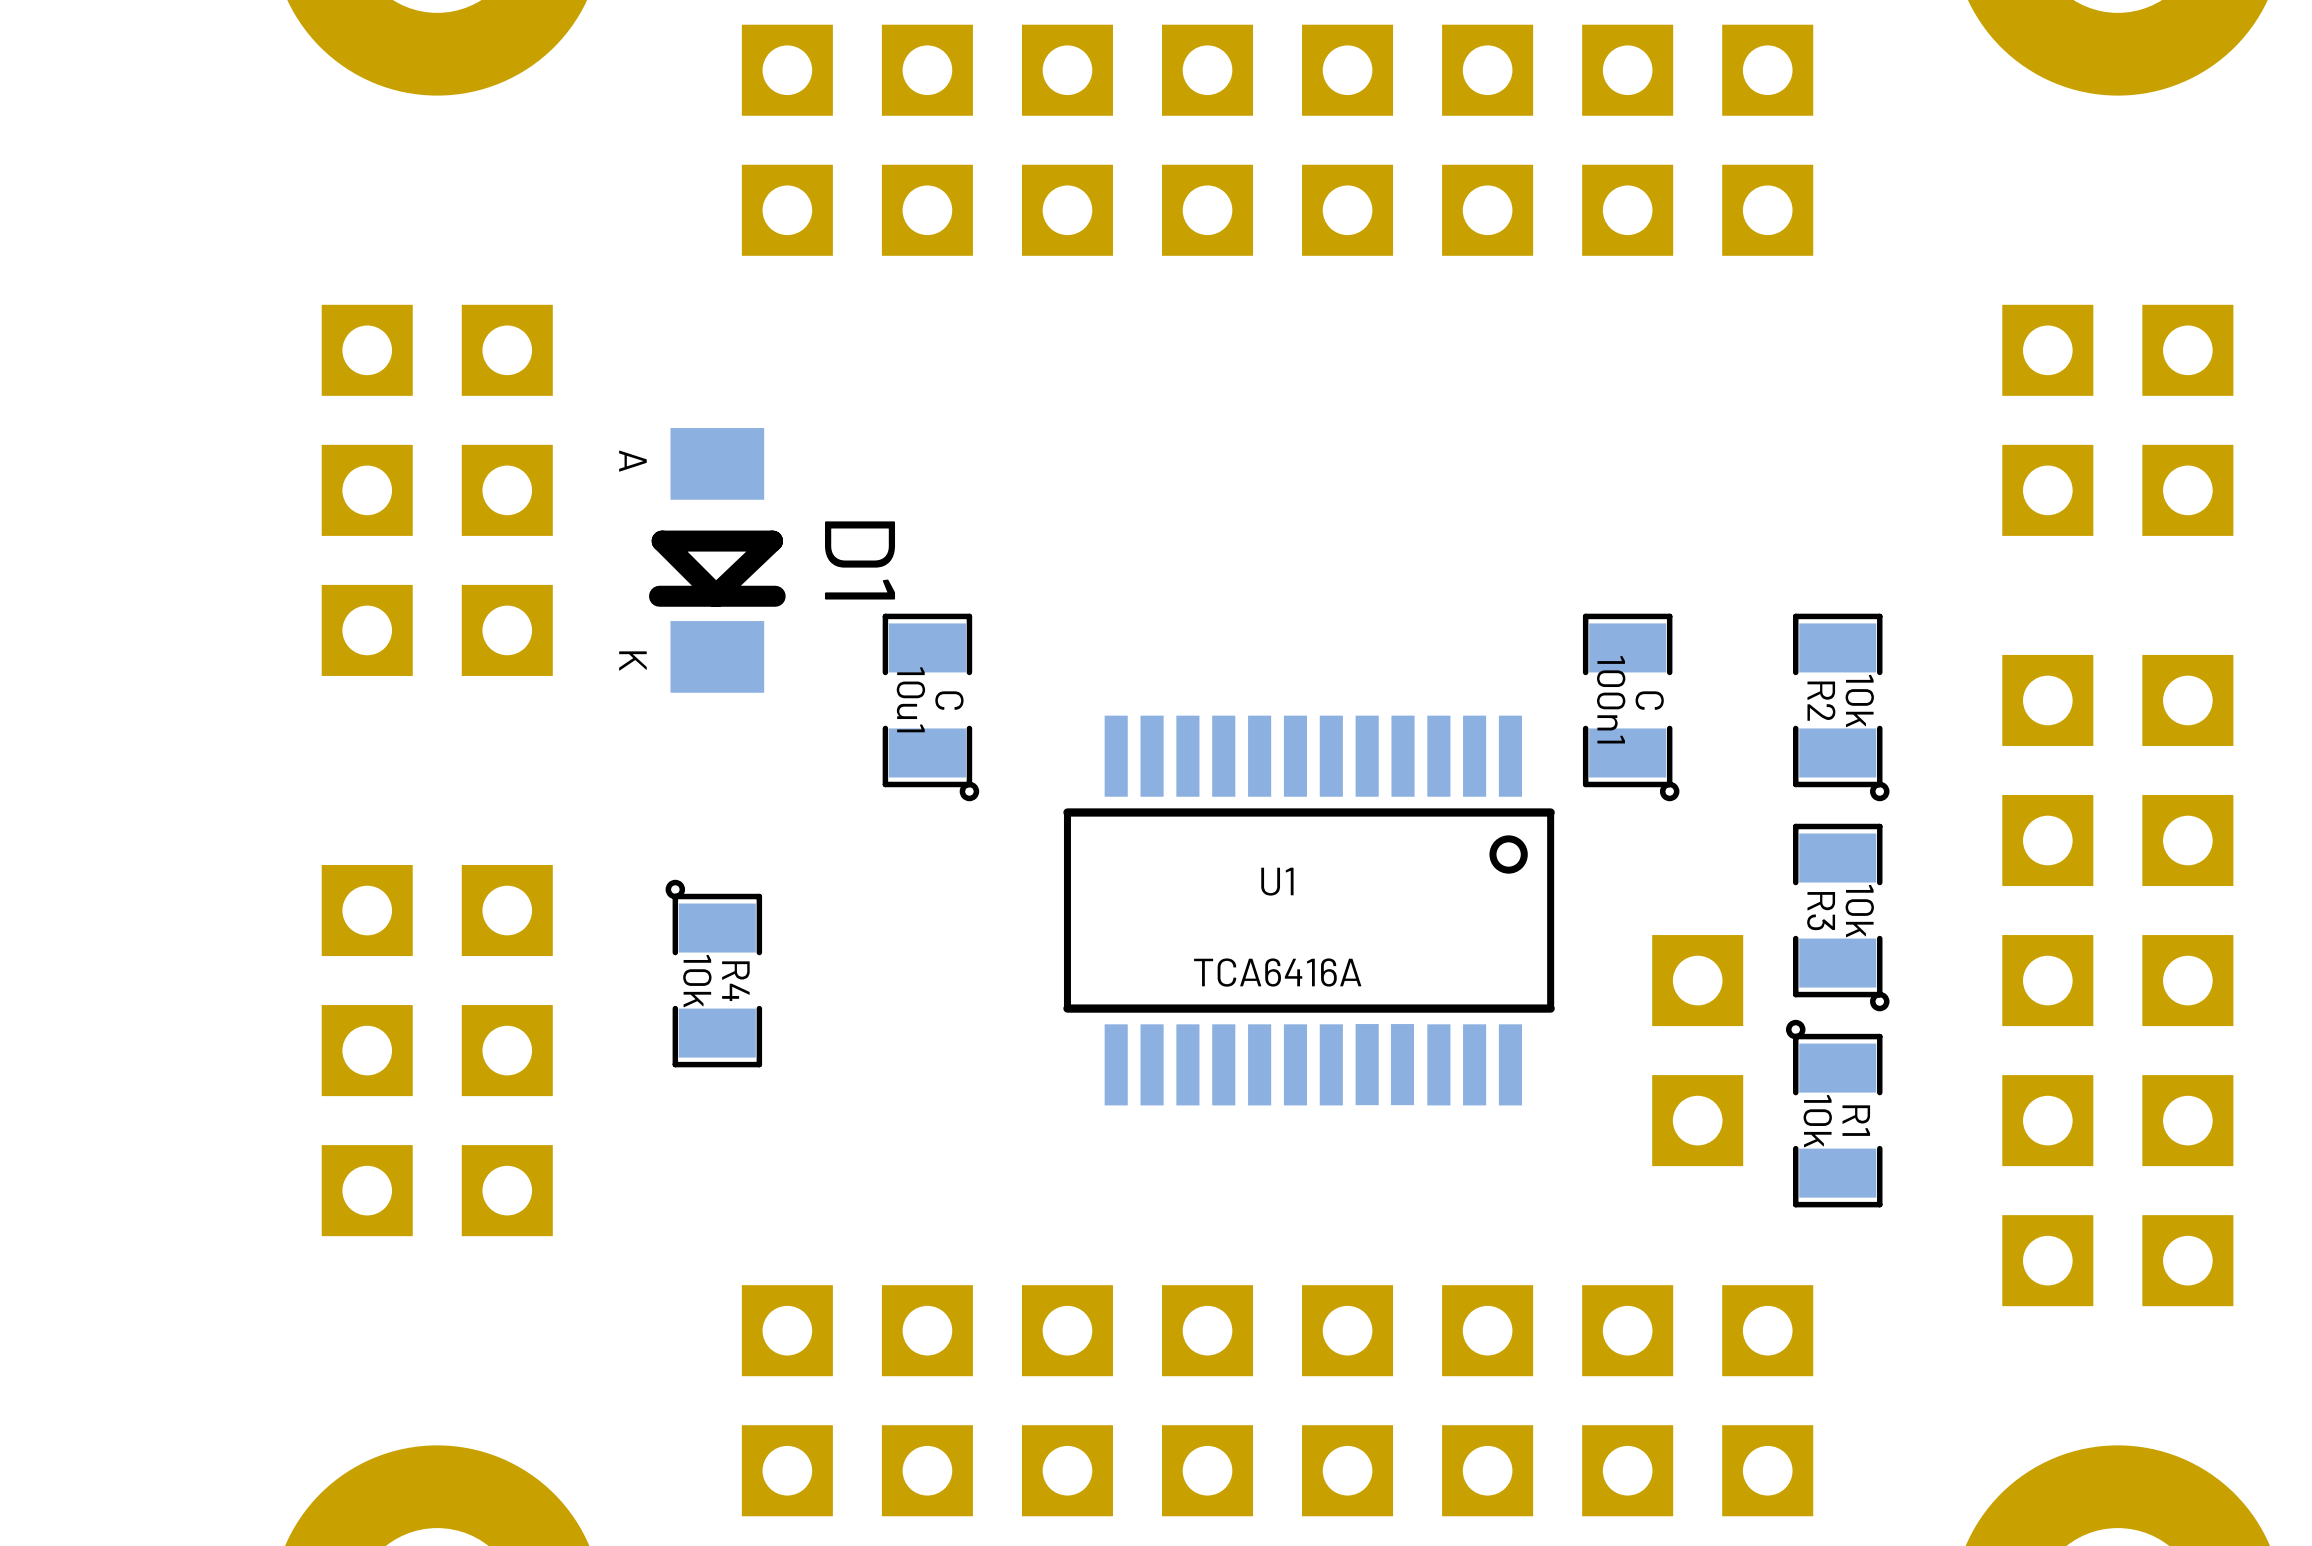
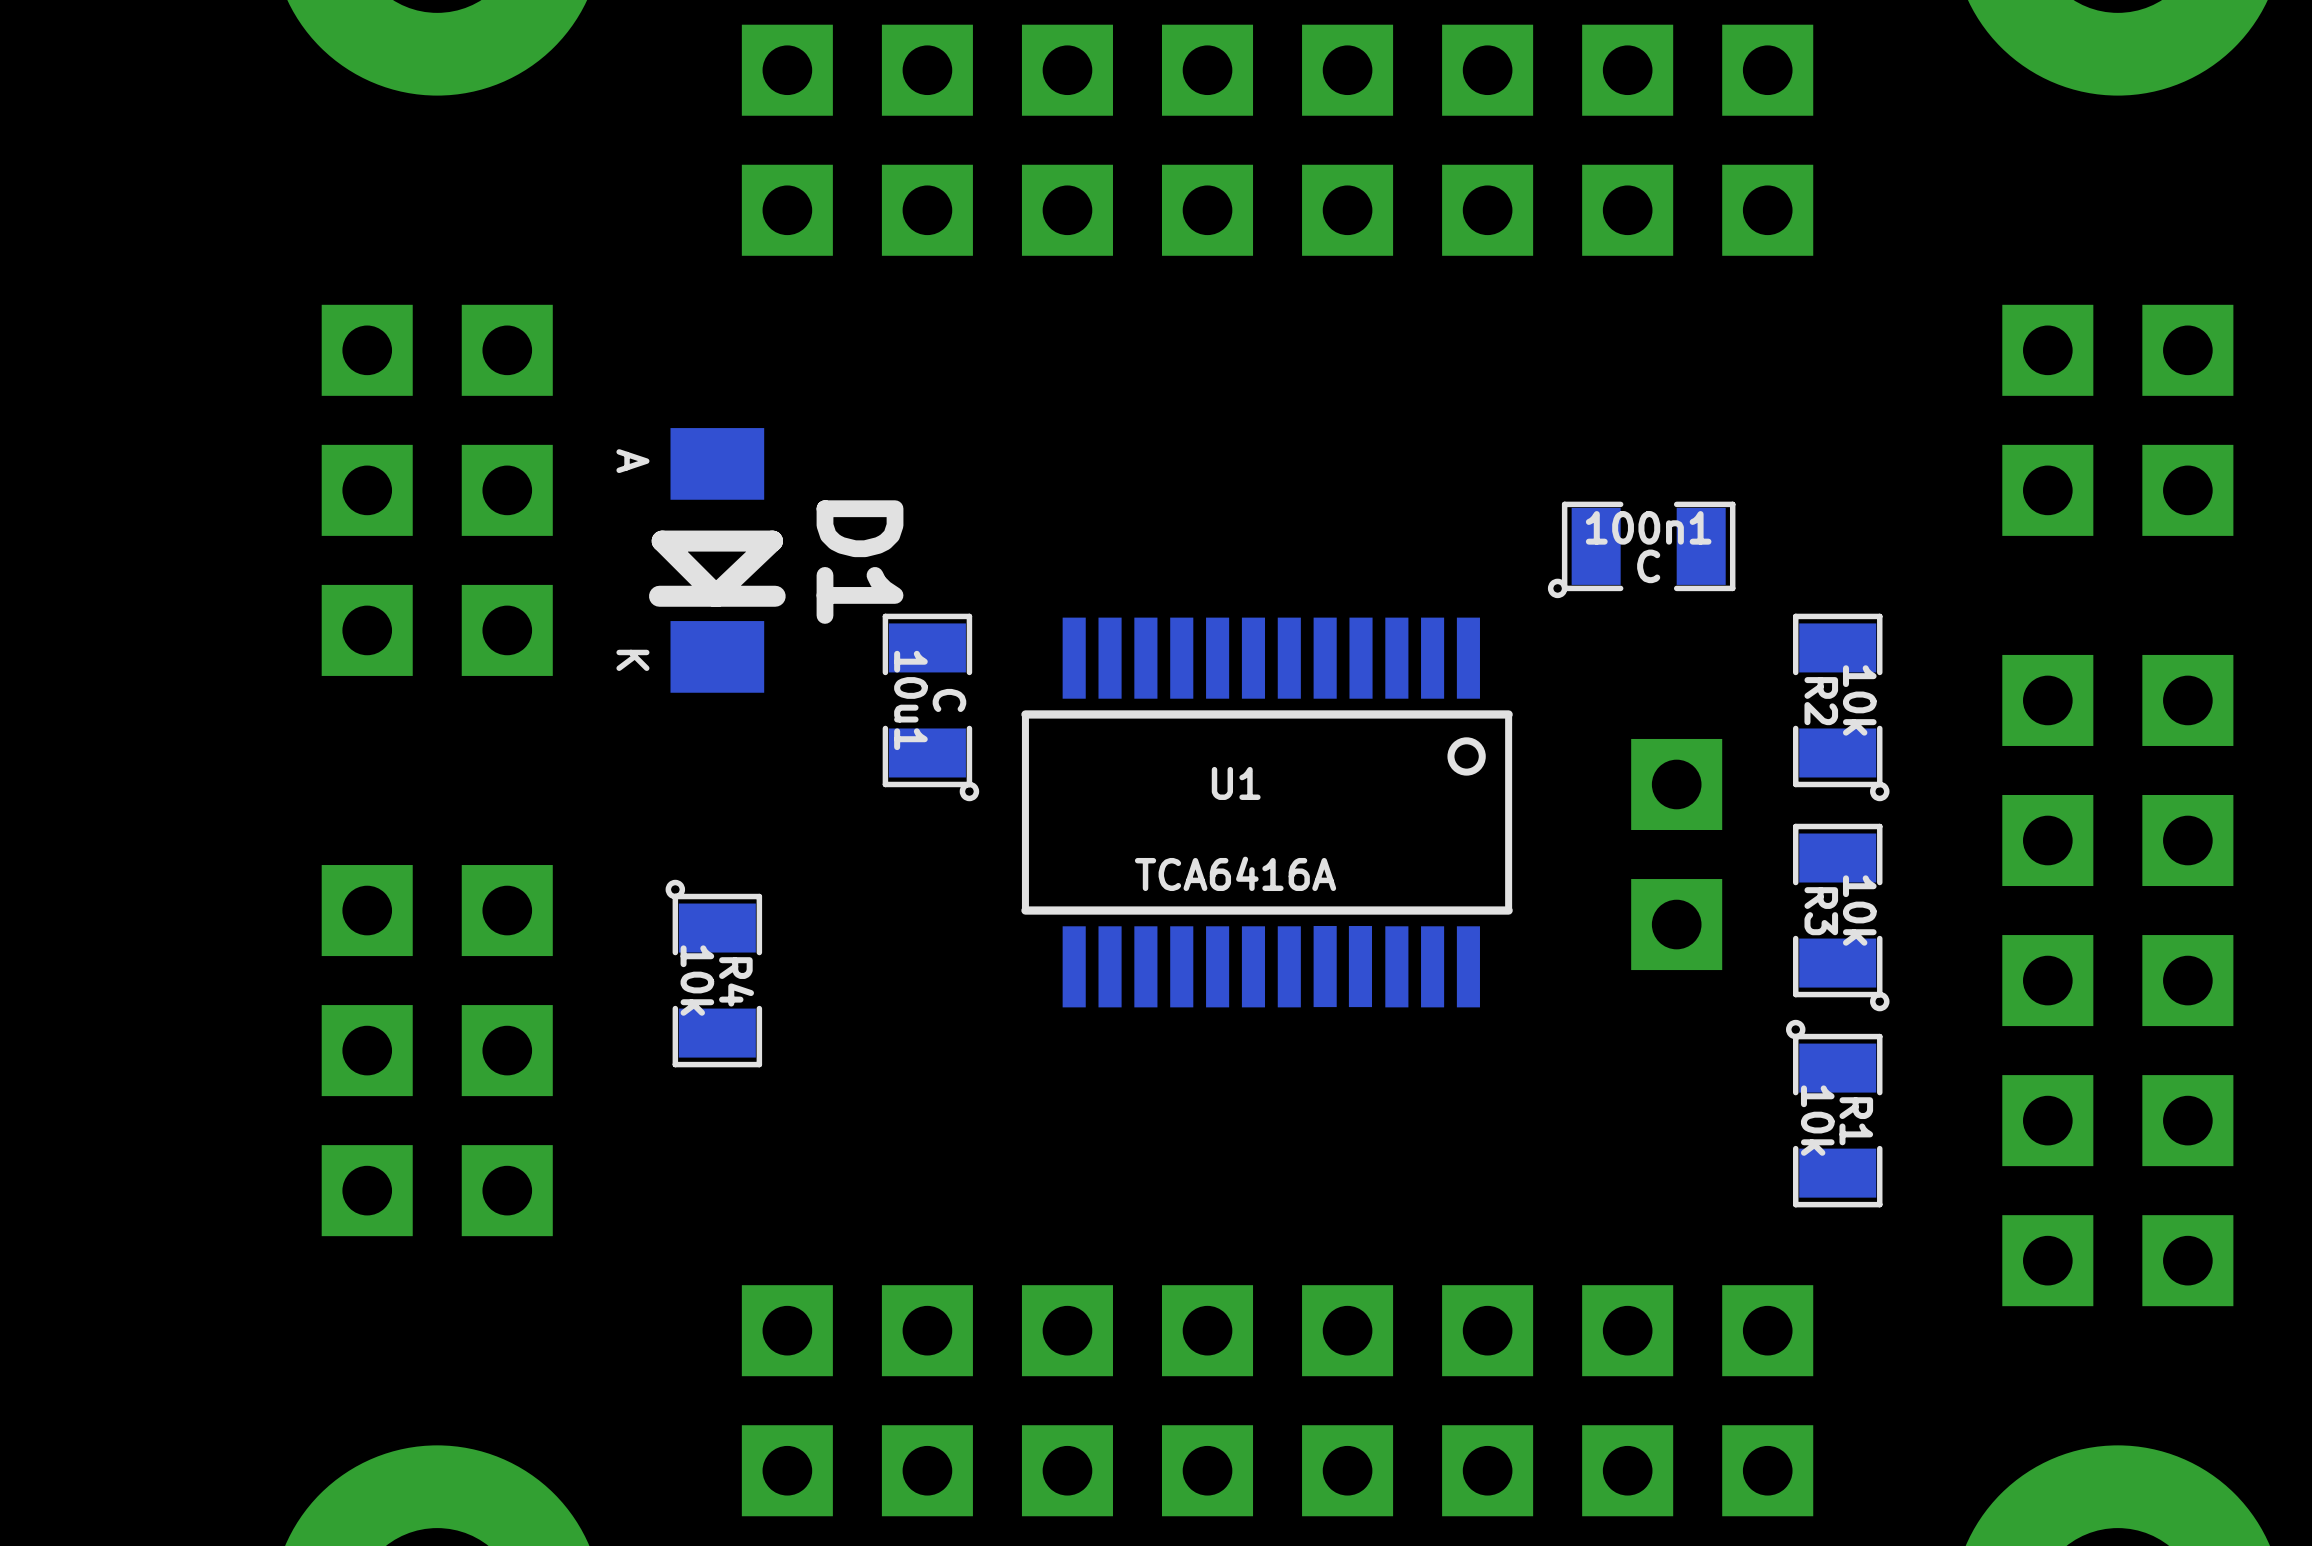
100n1 rotation: 0° (1631, 707) -> 90° clockwise (1641, 549)
100n1 position: (1631, 707) -> (1641, 549)
U1 position: (1309, 910) -> (1267, 812)
part position: (1697, 1050) -> (1676, 854)

